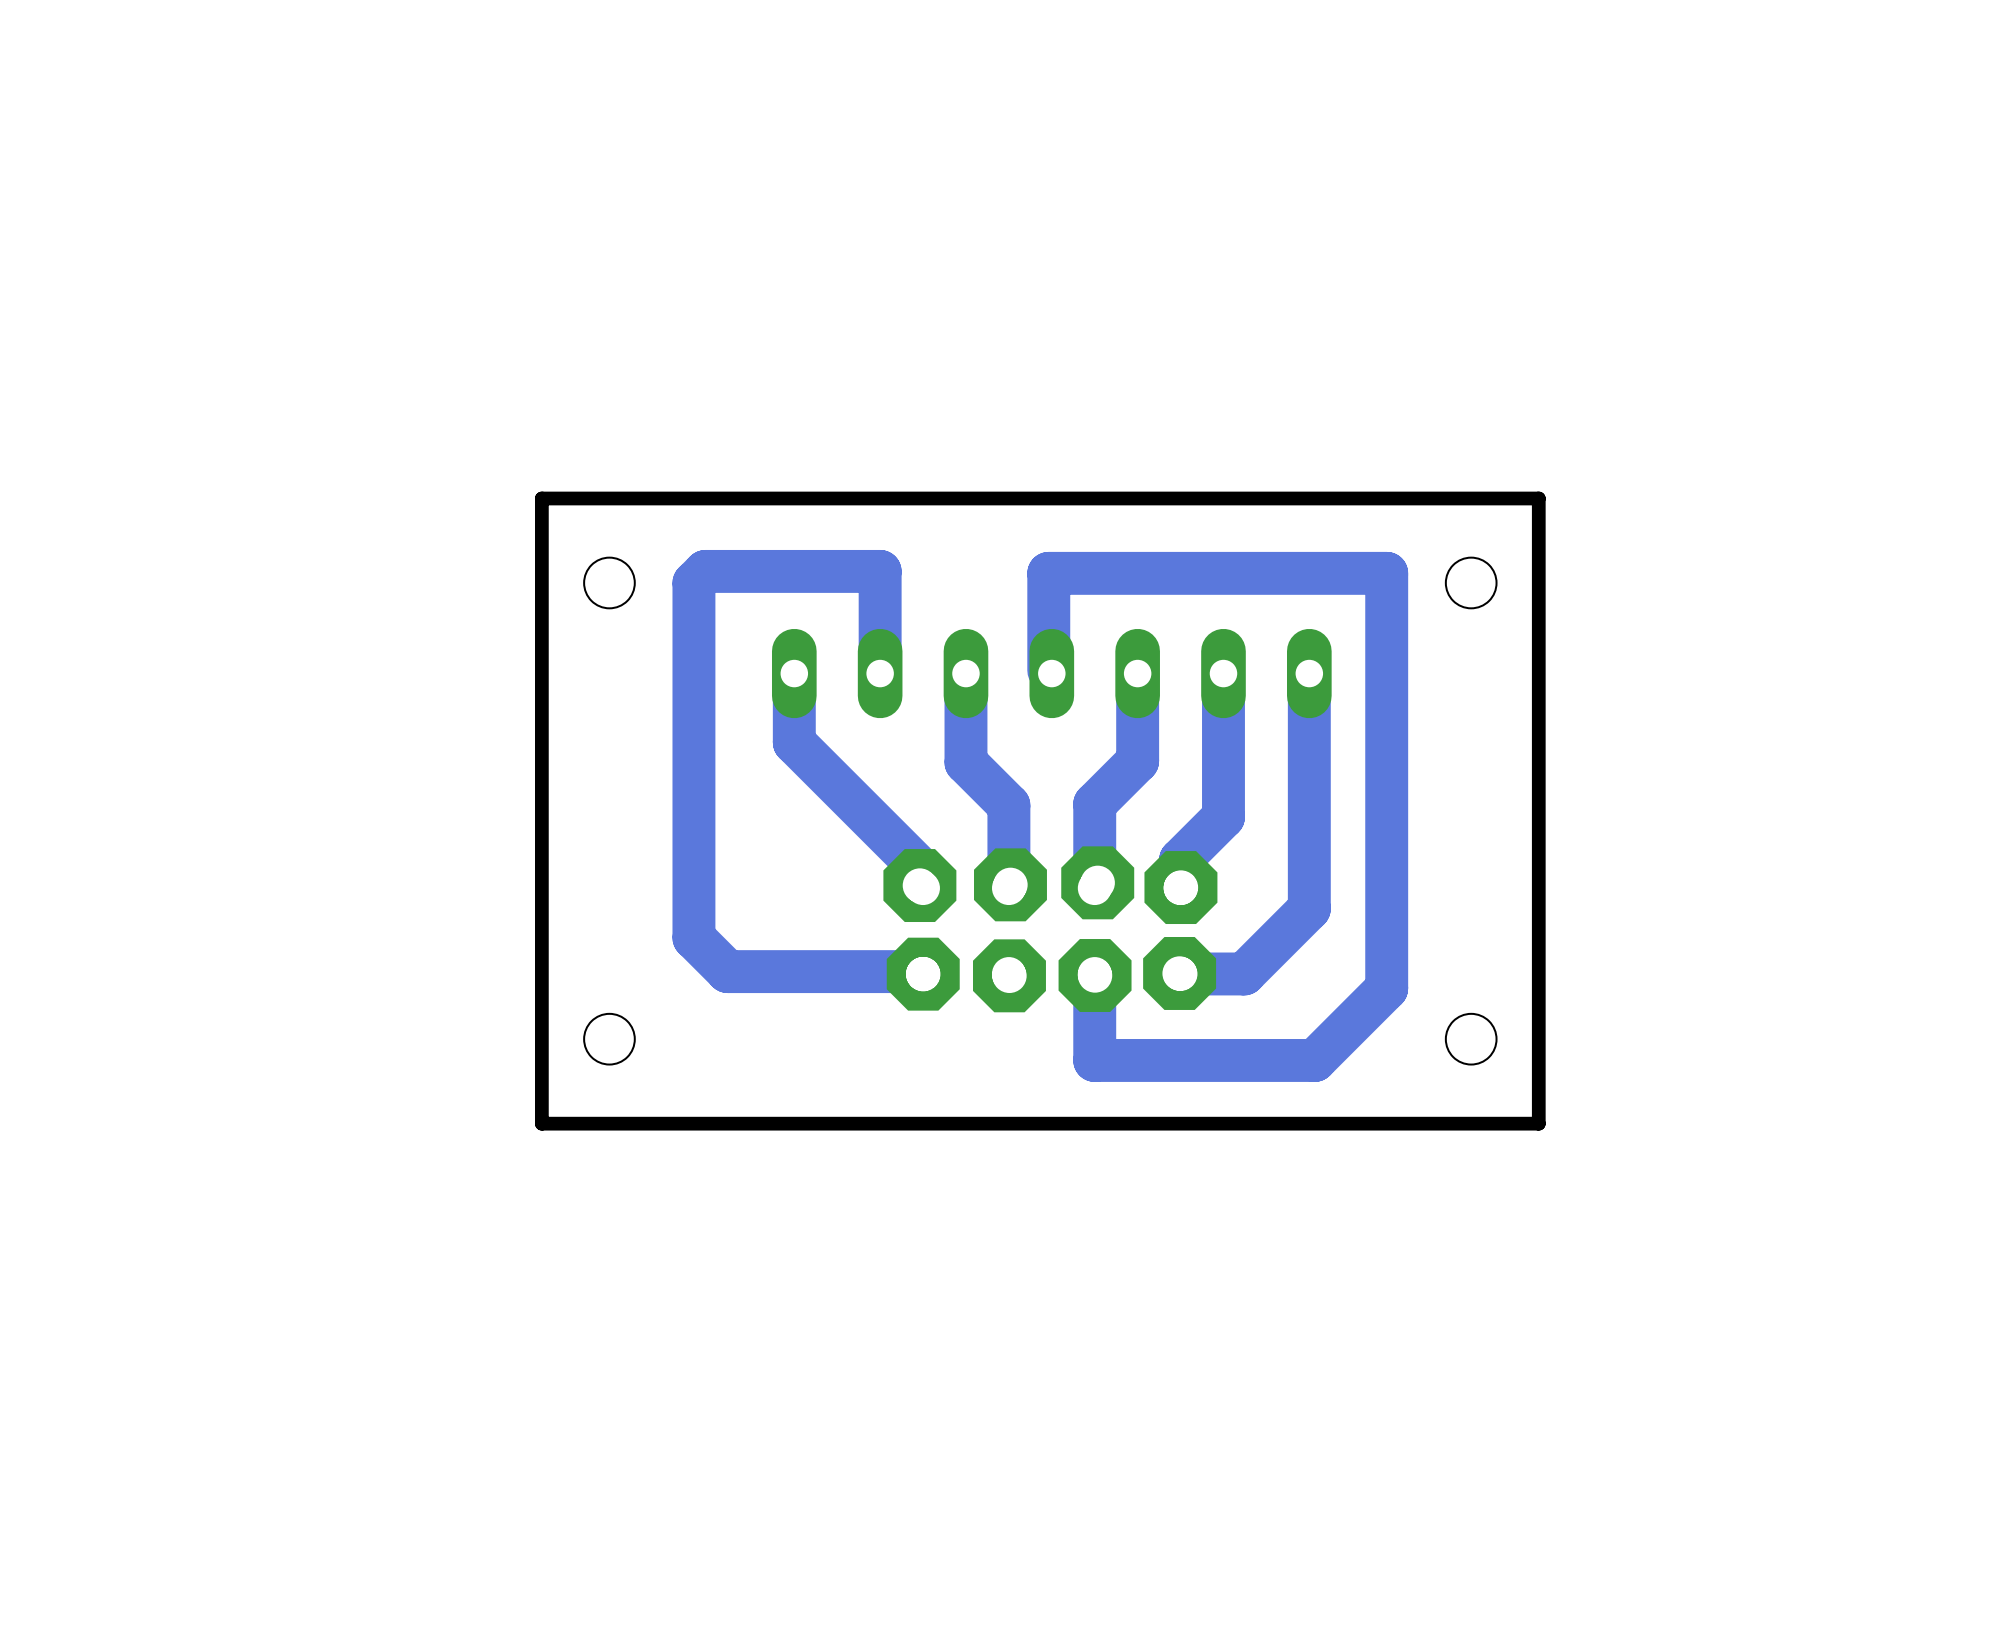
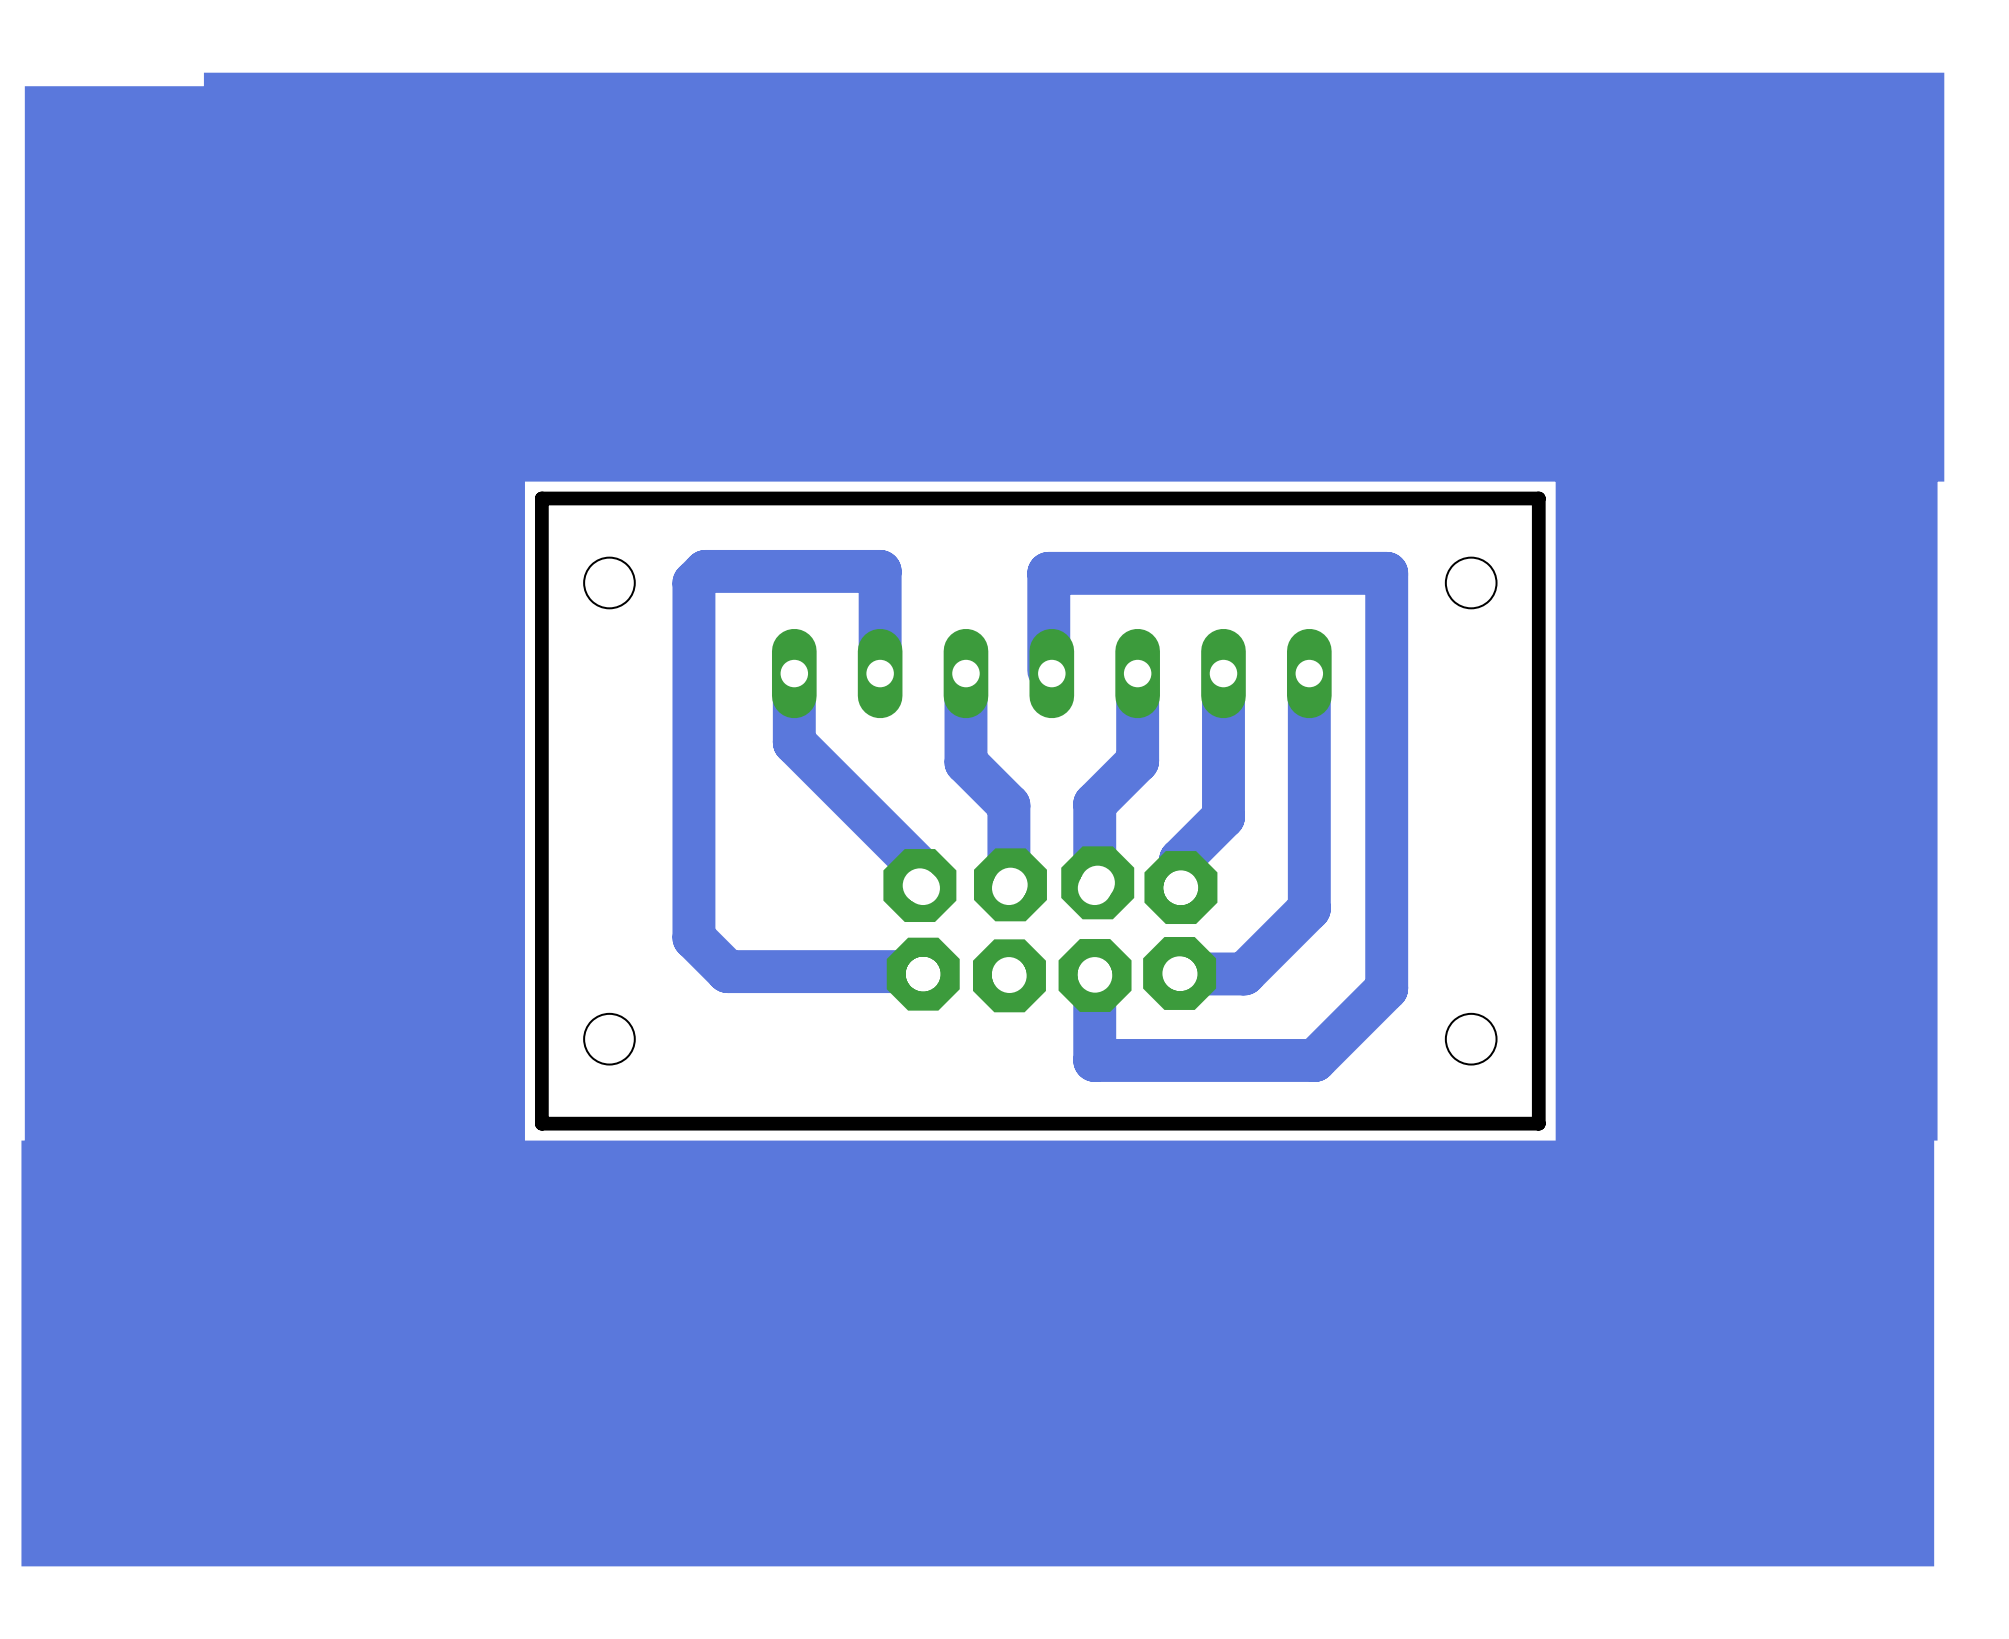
drawing: none -> [21, 72, 1945, 1567]

